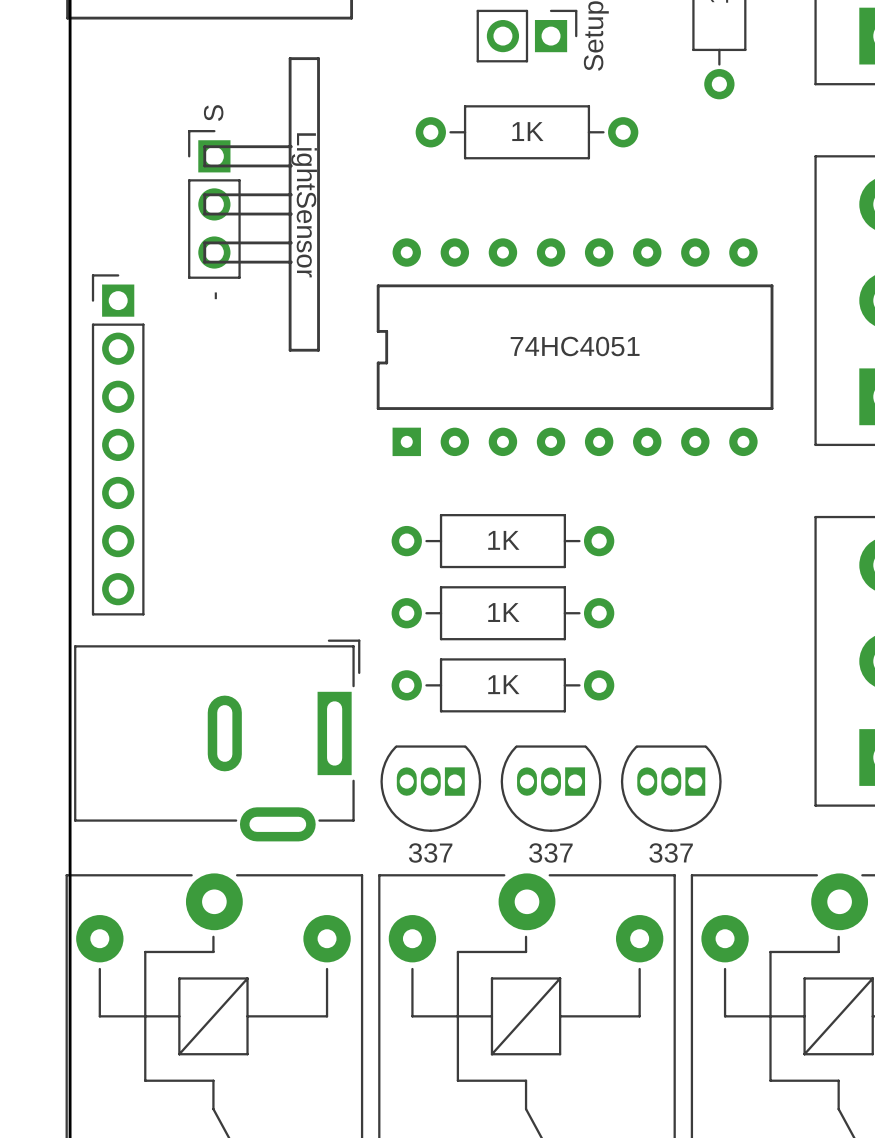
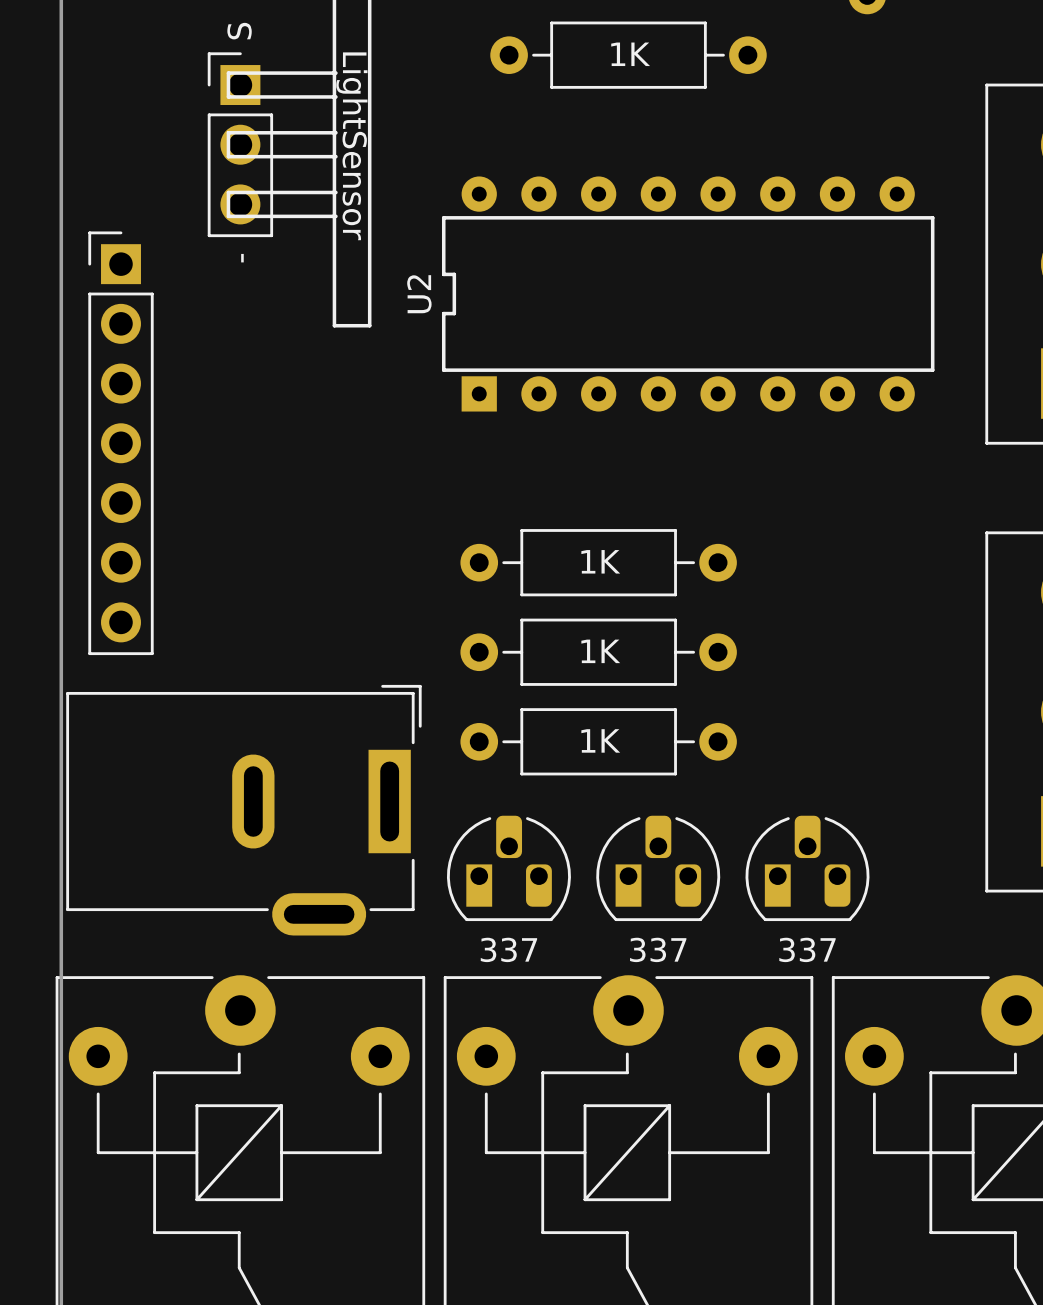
U2: none -> (688, 293)
part: 74HC4051 (575, 347) -> none
part footprint: [380, 745, 482, 832] -> [446, 815, 571, 922]
part footprint: [500, 745, 602, 832] -> [596, 815, 721, 922]
part footprint: [620, 745, 722, 832] -> [745, 815, 870, 922]

